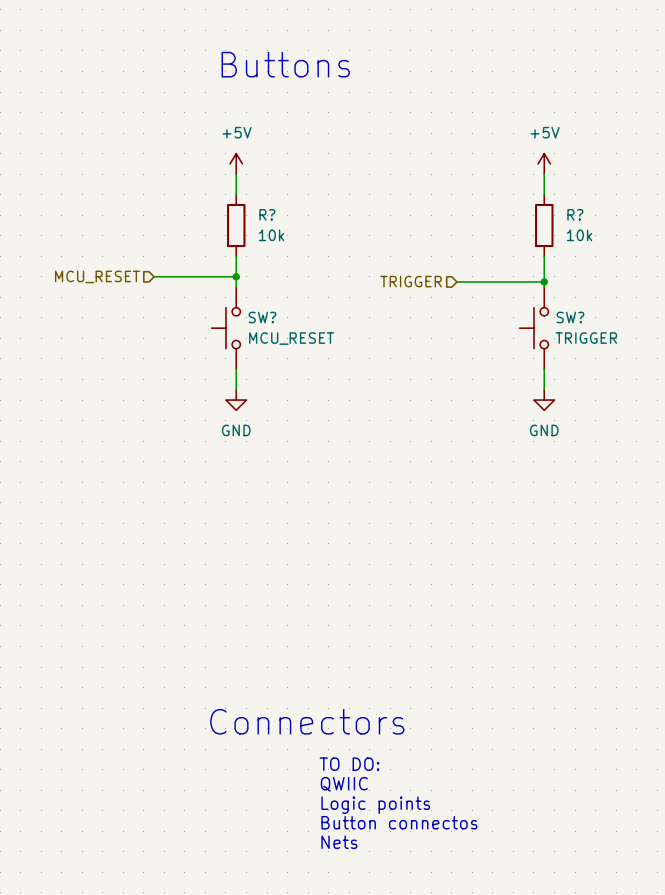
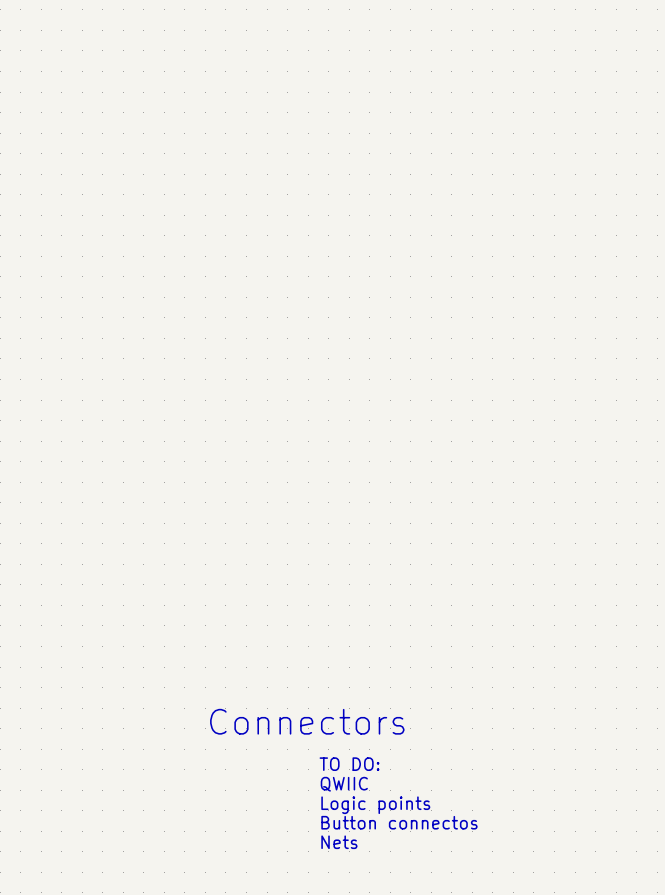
text: Buttons (285, 64) -> none
power symbol: +5V (236, 163) -> none
power symbol: +5V (544, 163) -> none
wire: (236, 174) (236, 194) -> none
wire: (544, 174) (544, 194) -> none
R?: 10k (236, 225) -> none
R?: 10k (544, 225) -> none
wire: (236, 256) (236, 287) -> none
wire: (544, 256) (544, 287) -> none
hierarchical label: MCU_RESET (97, 276) -> none
wire: (154, 276) (236, 276) -> none
junction: (236, 276) -> none
hierarchical label: TRIGGER (411, 281) -> none
wire: (456, 281) (544, 281) -> none
junction: (544, 281) -> none
SW?: MCU_RESET (225, 328) -> none
SW?: TRIGGER (533, 328) -> none
wire: (236, 369) (236, 389) -> none
wire: (544, 369) (544, 389) -> none
power symbol: GND (236, 400) -> none
power symbol: GND (544, 400) -> none

